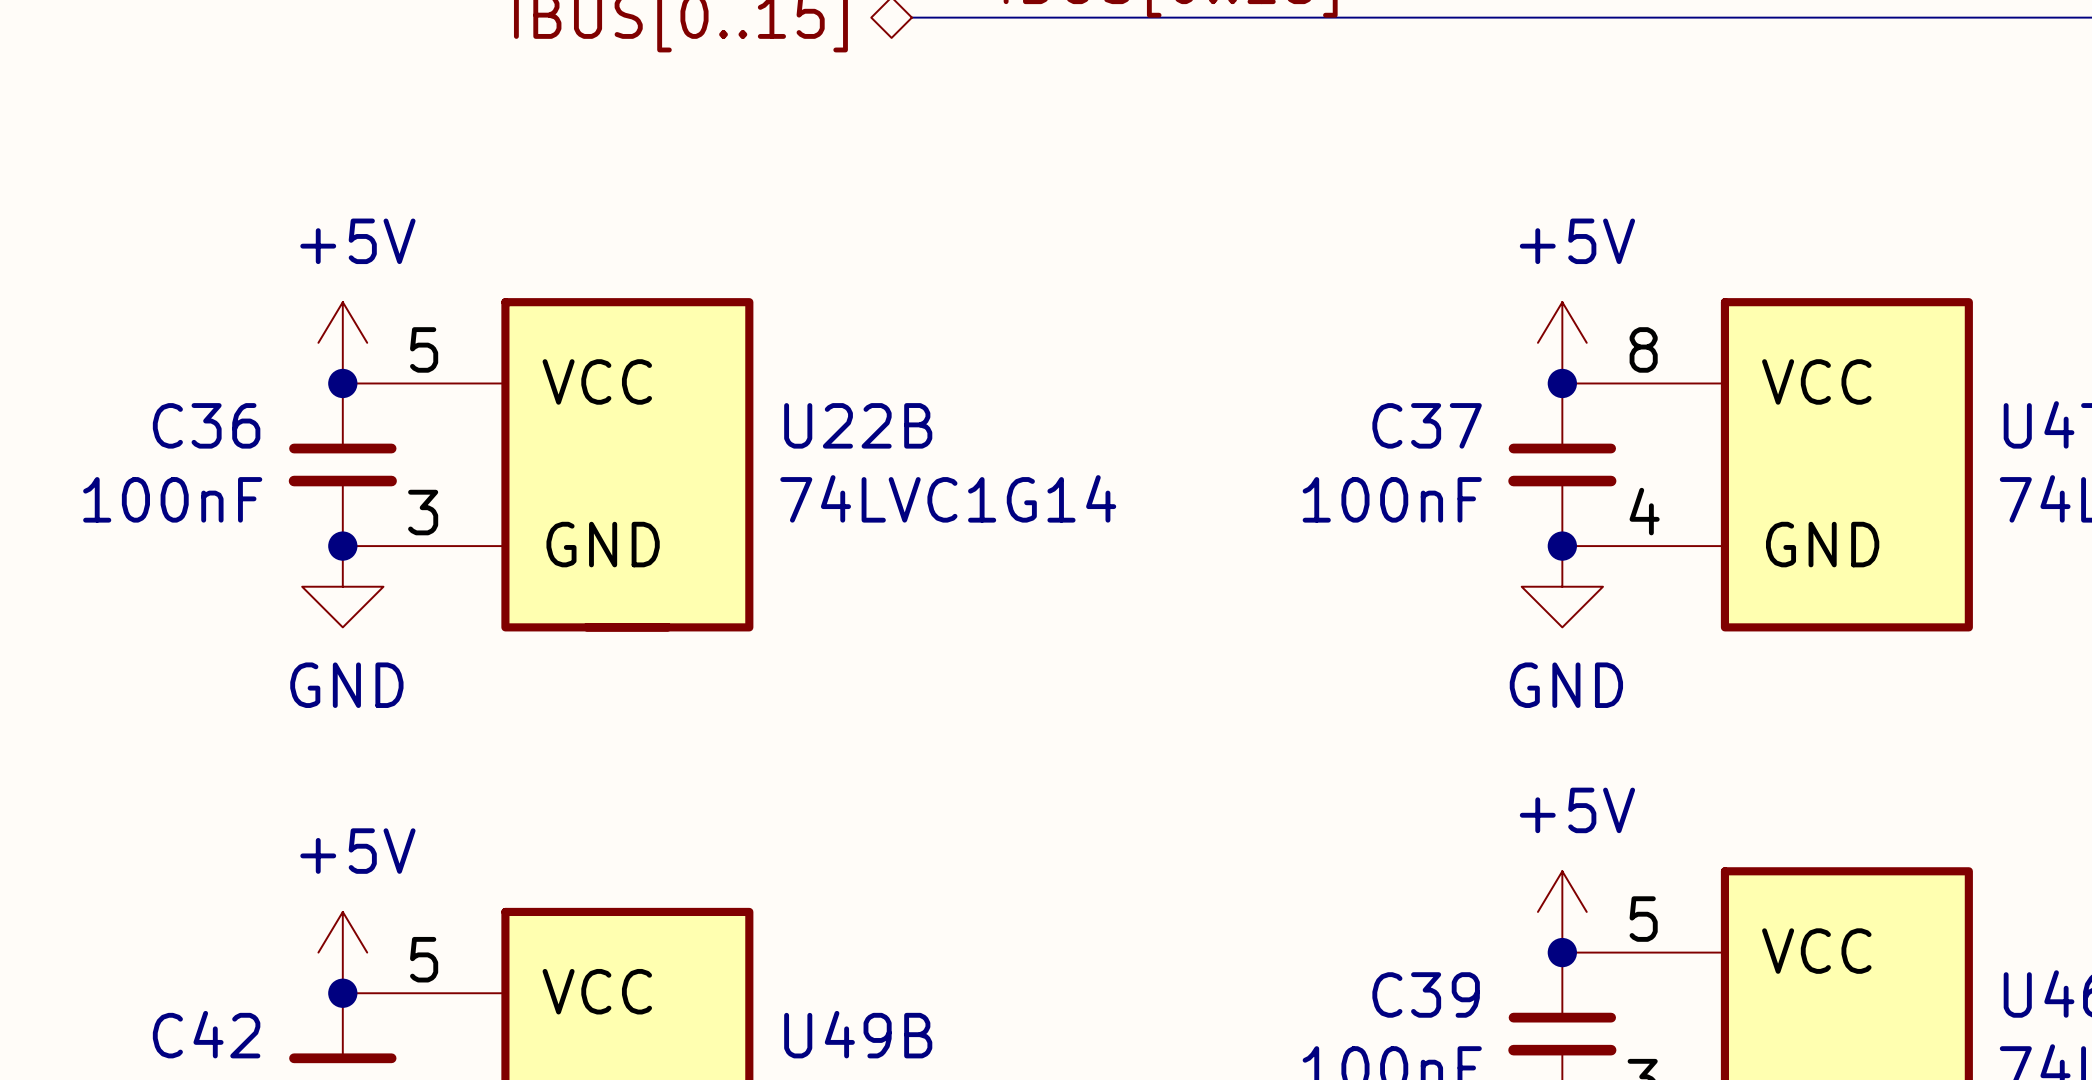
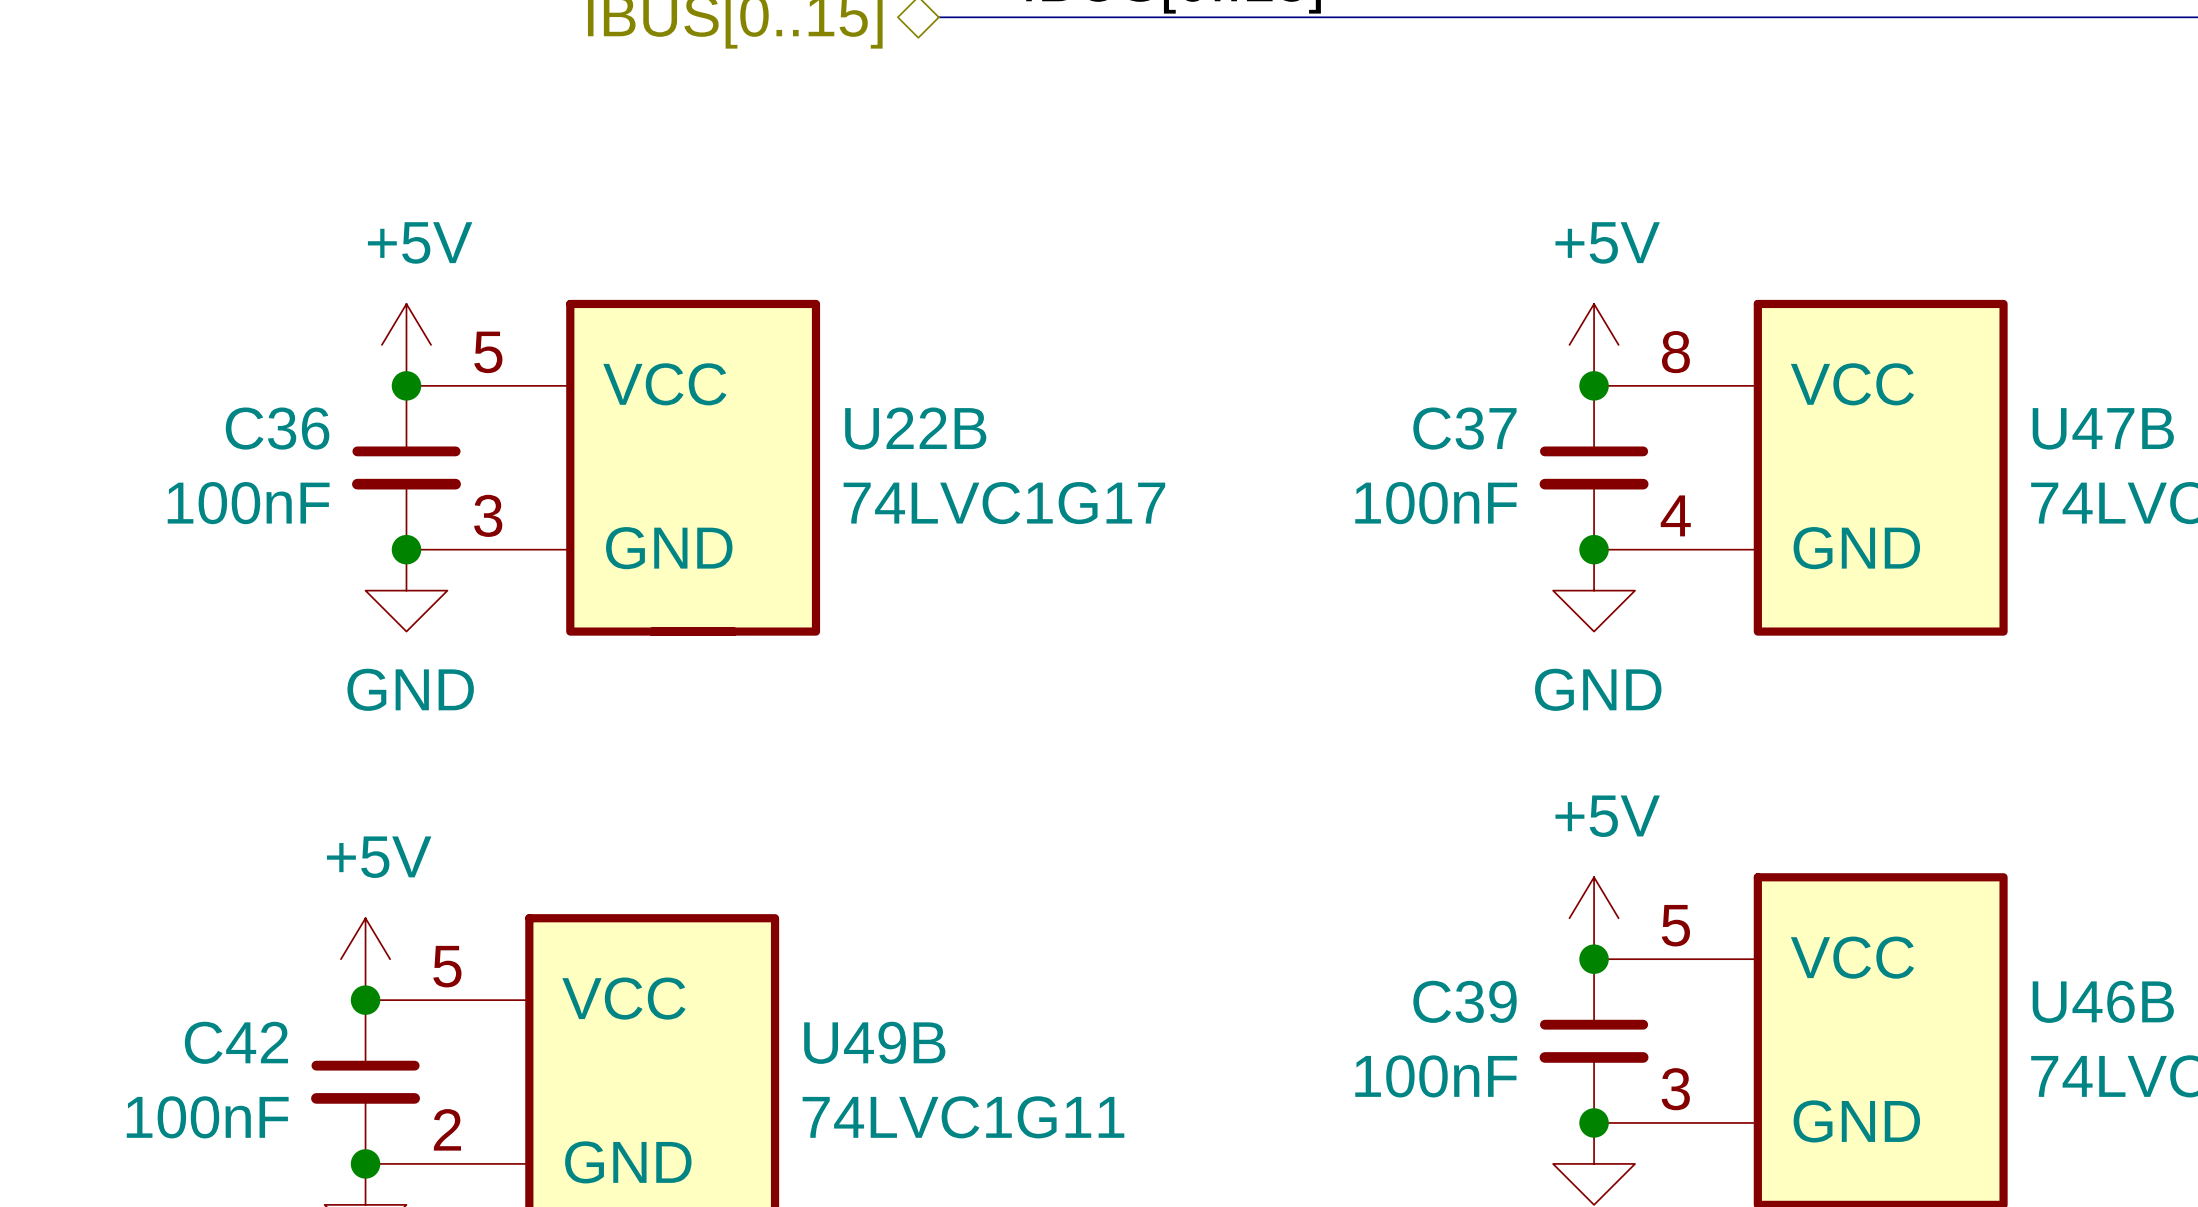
power symbol position: +5V (342, 342) -> +5V (406, 344)
junction position: (342, 383) -> (406, 385)
C36 position: (342, 464) -> (406, 467)
U22B position: (548, 464) -> (613, 467)
U22B value: 74LVC1G14 (948, 498) -> 74LVC1G17 (1004, 503)
junction position: (342, 546) -> (406, 549)
power symbol position: GND (342, 586) -> GND (406, 590)

